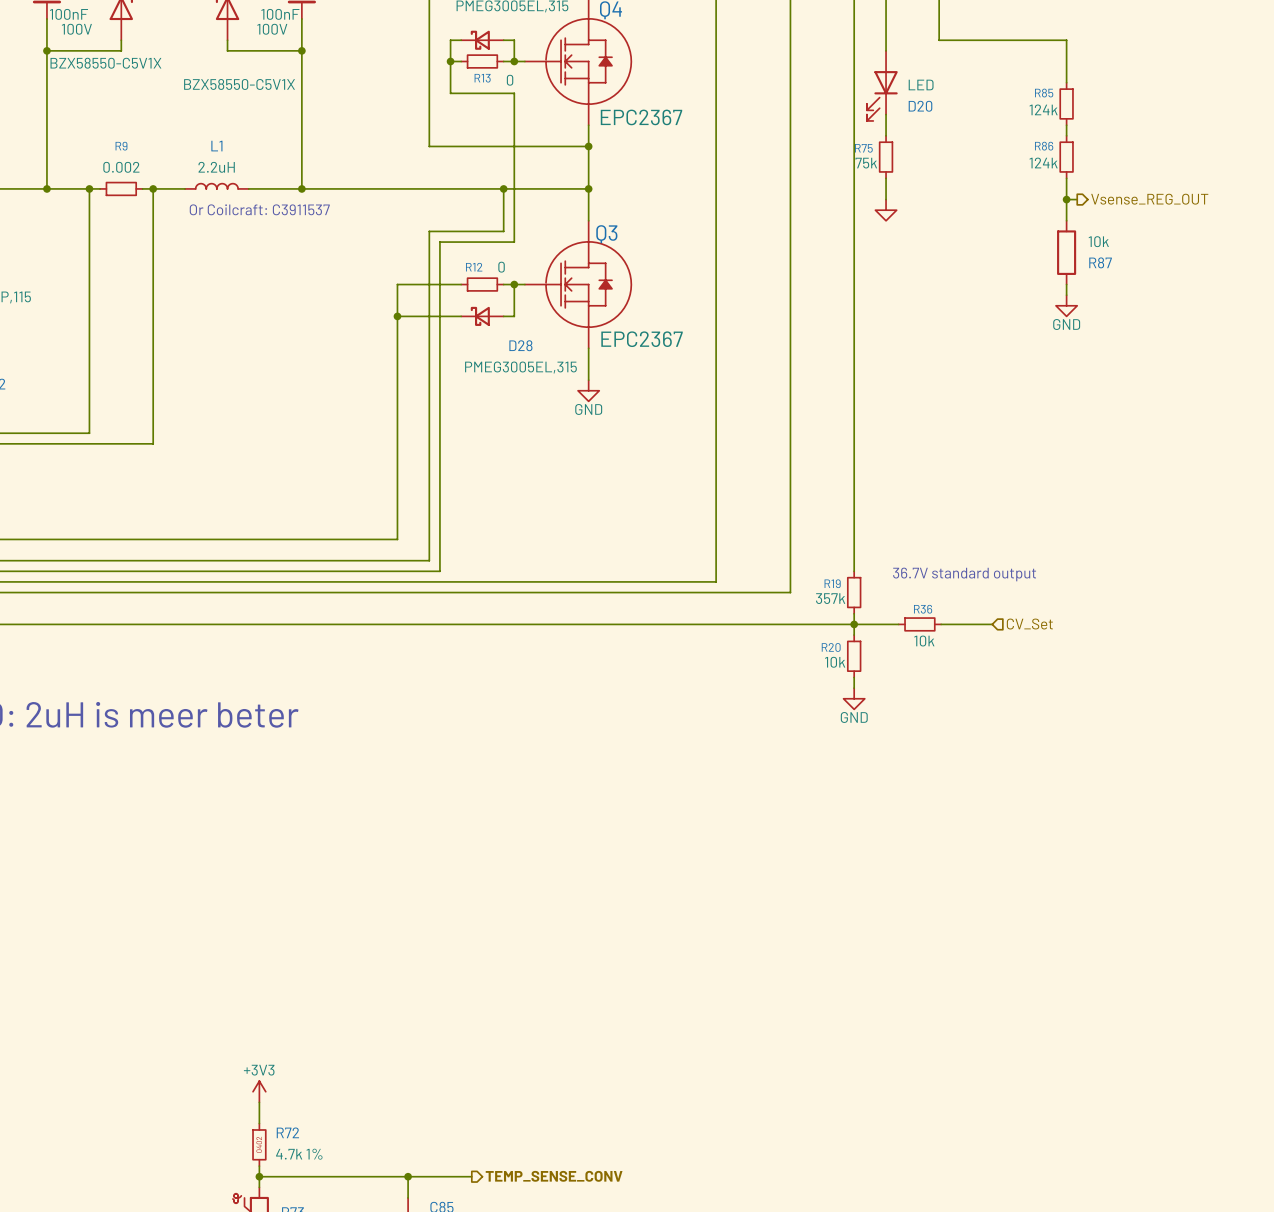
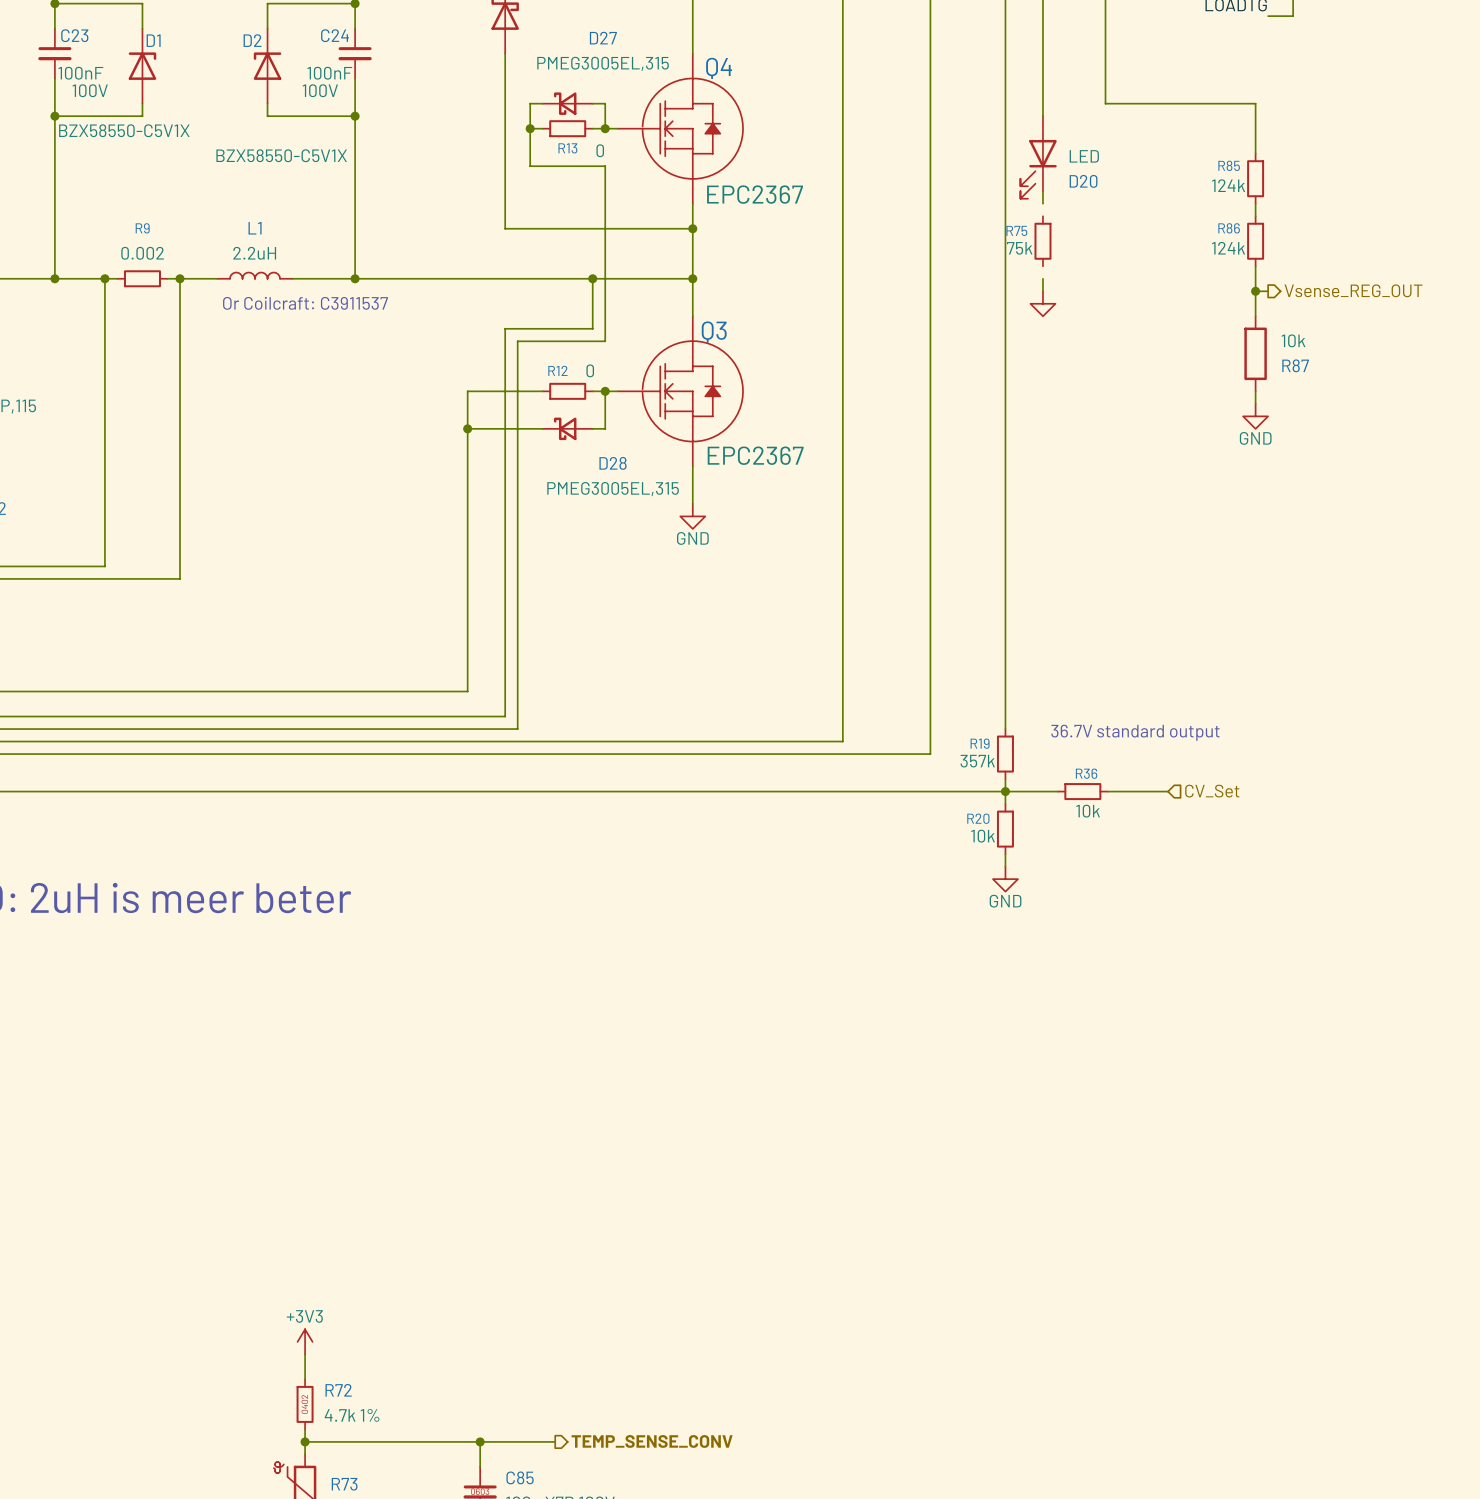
wire: (886, 125) (886, 135) -> none
wire: (886, 178) (886, 188) -> none

